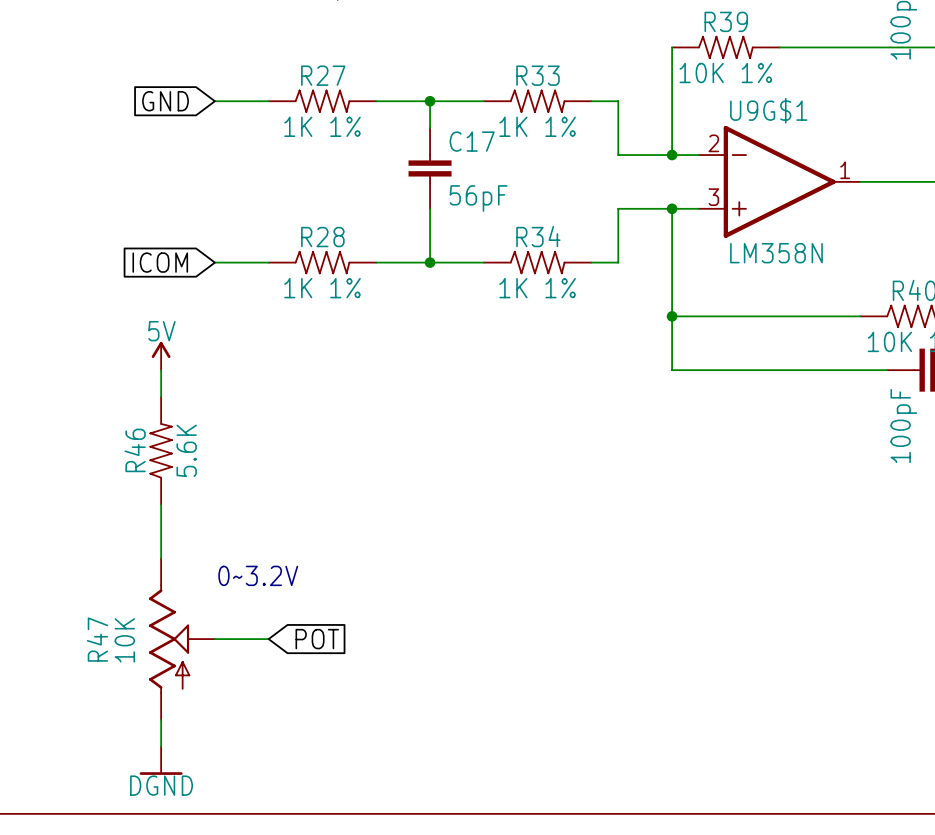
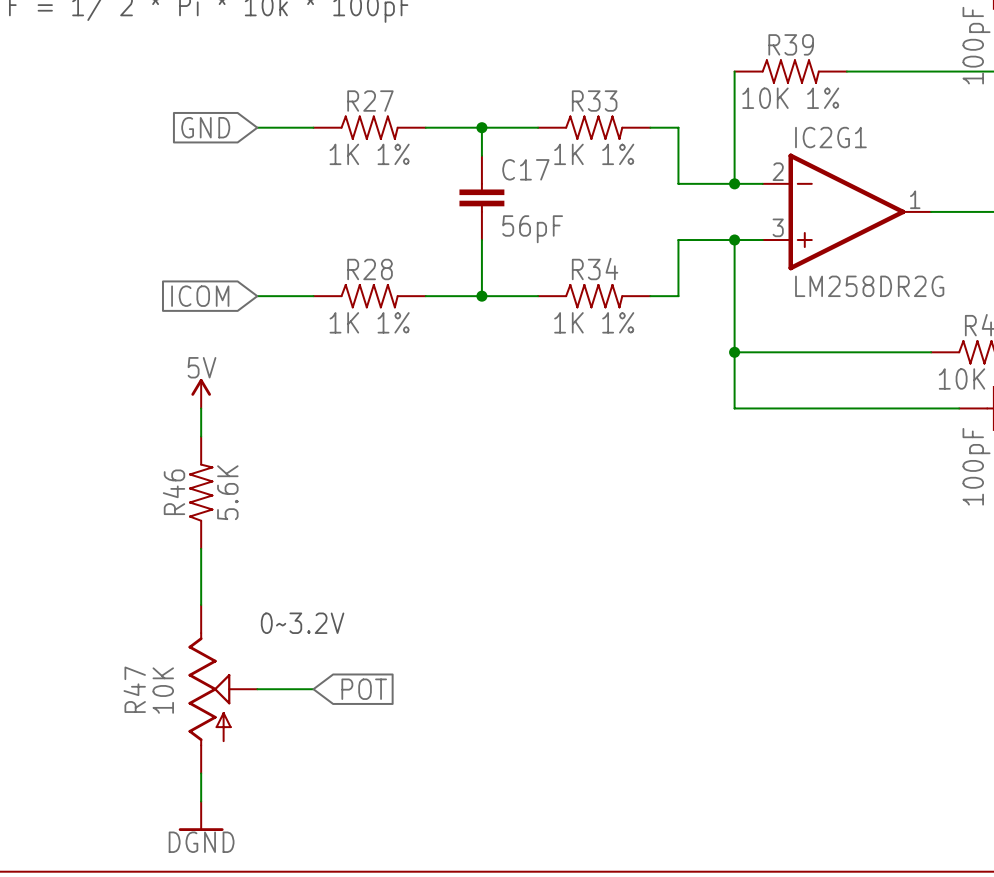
U9G$1 name: U9G$1 (768, 110) -> IC2G1 (830, 137)
U9G$1 value: LM358N (776, 253) -> LM258DR2G (869, 286)

